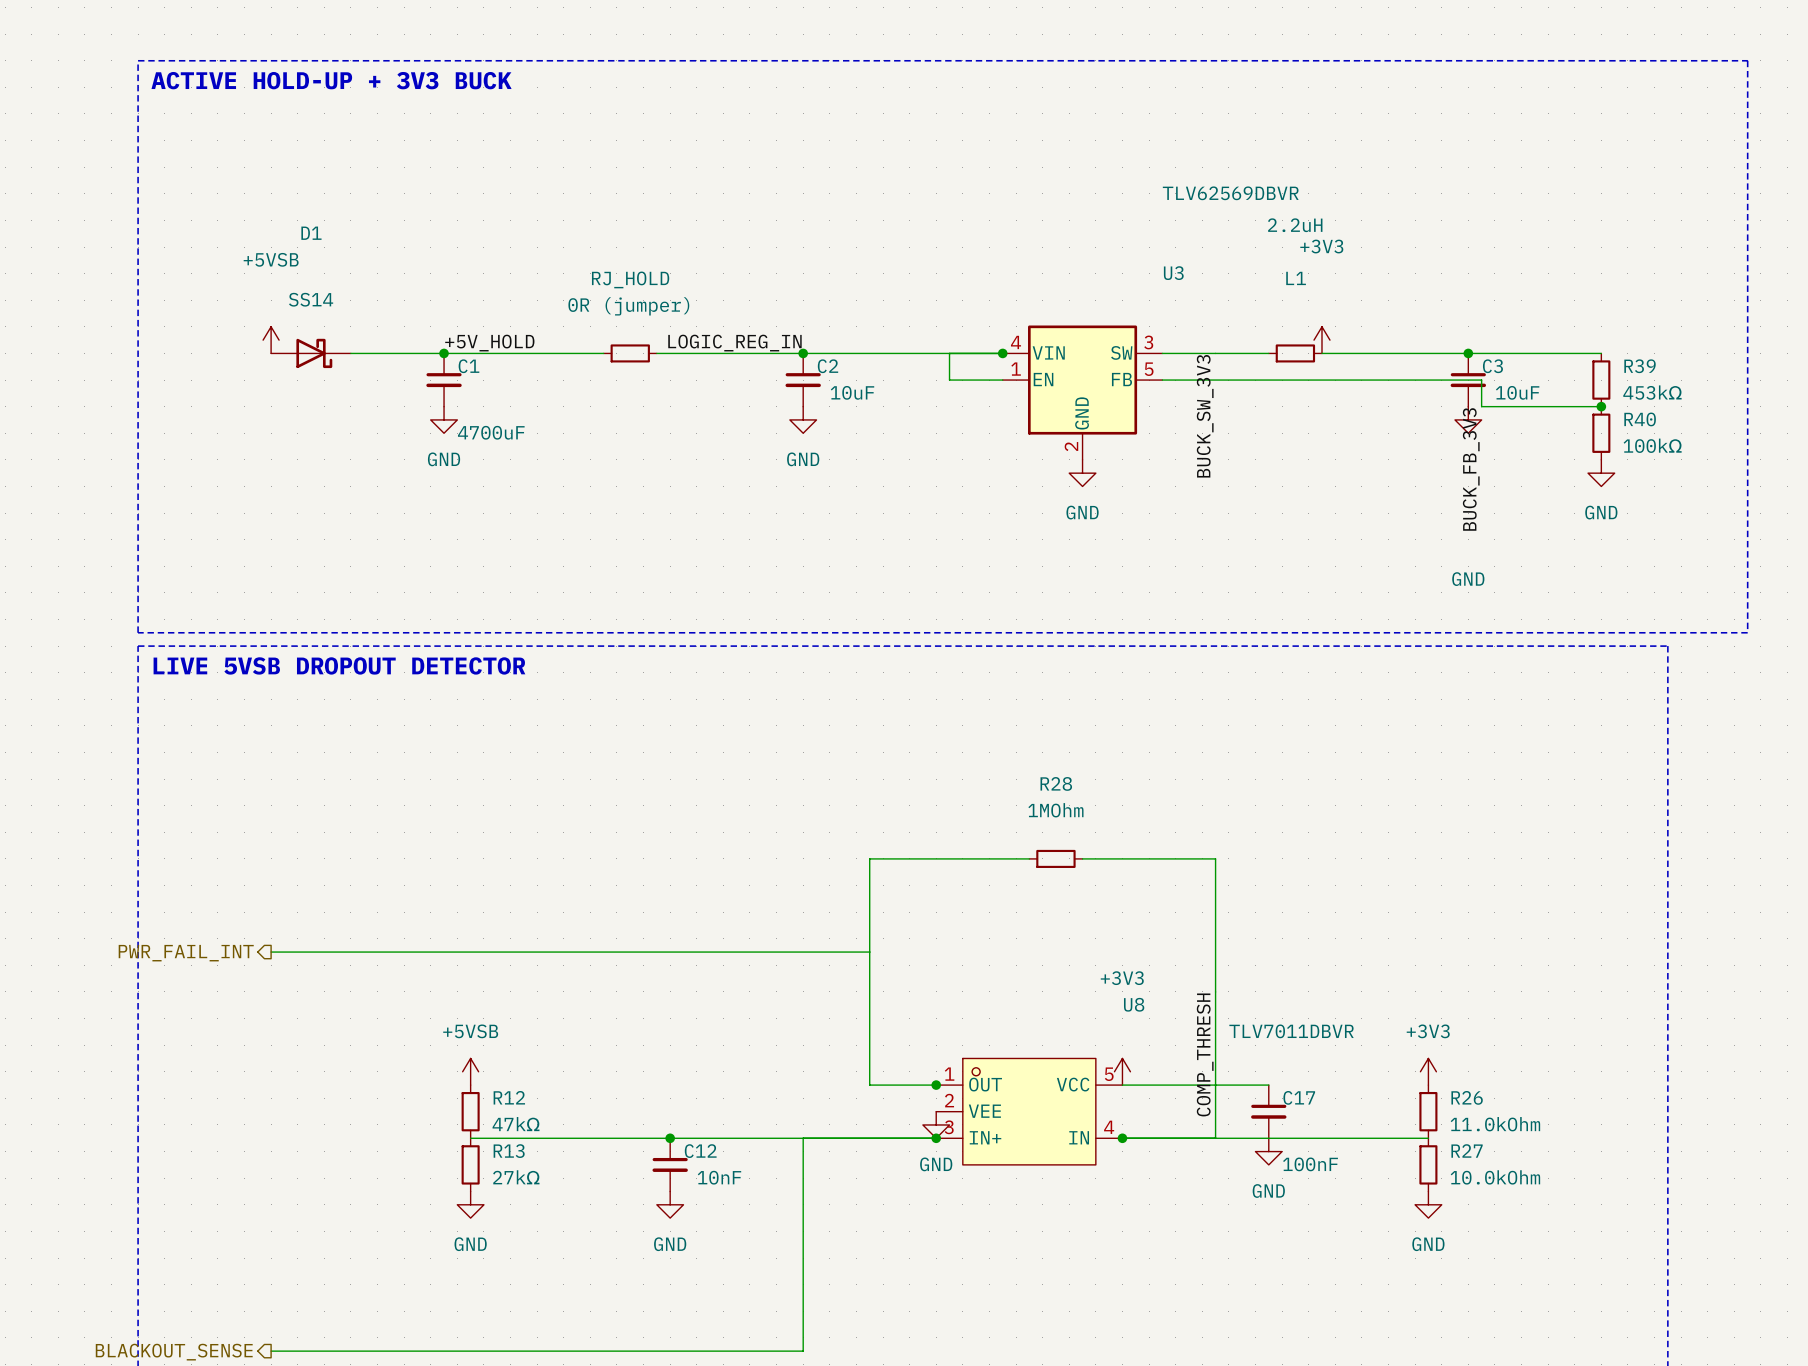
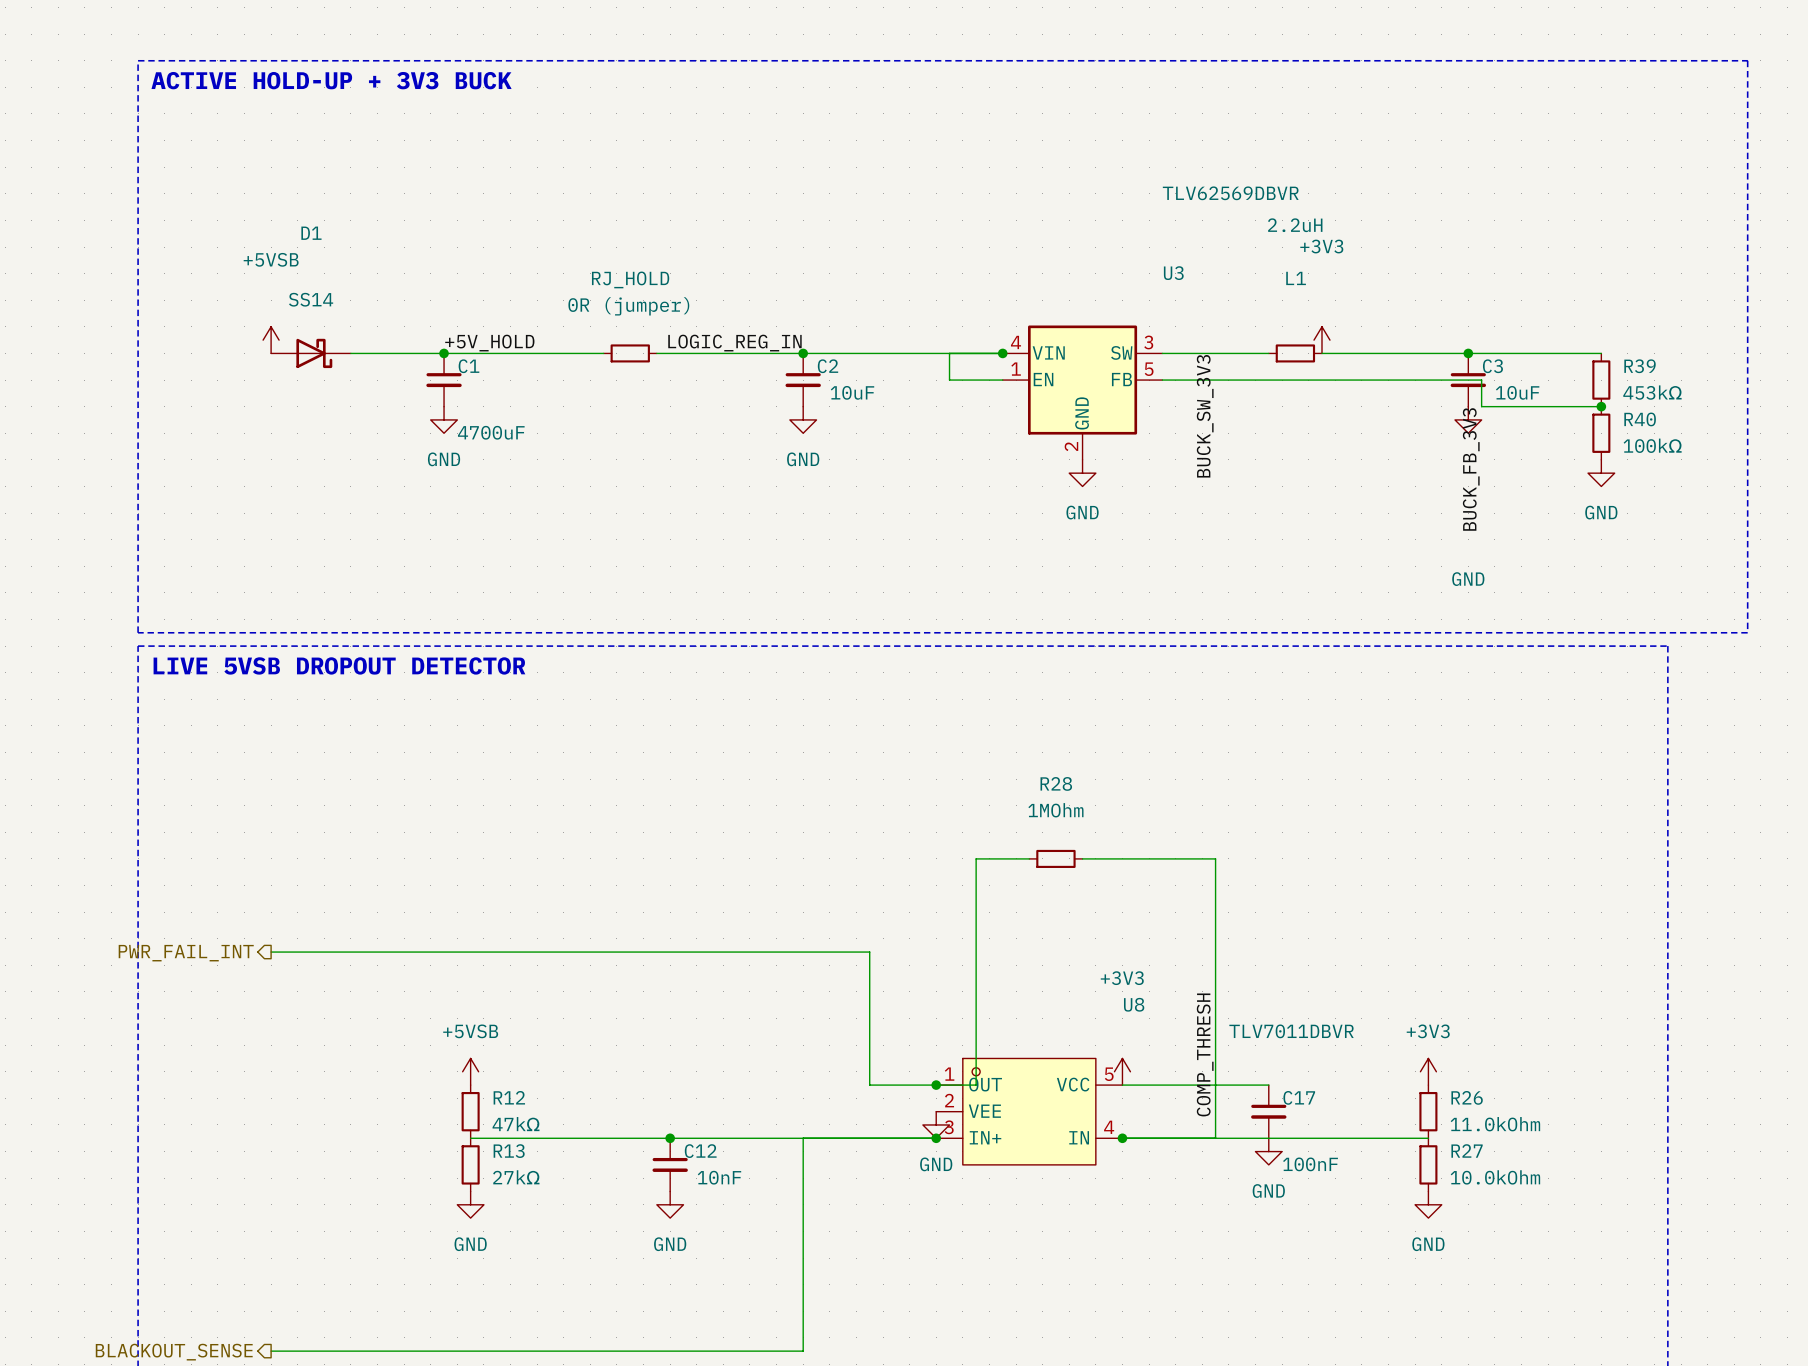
wire: (976, 858) (869, 858) (869, 952) -> (976, 858) (976, 1085) (936, 1085)

